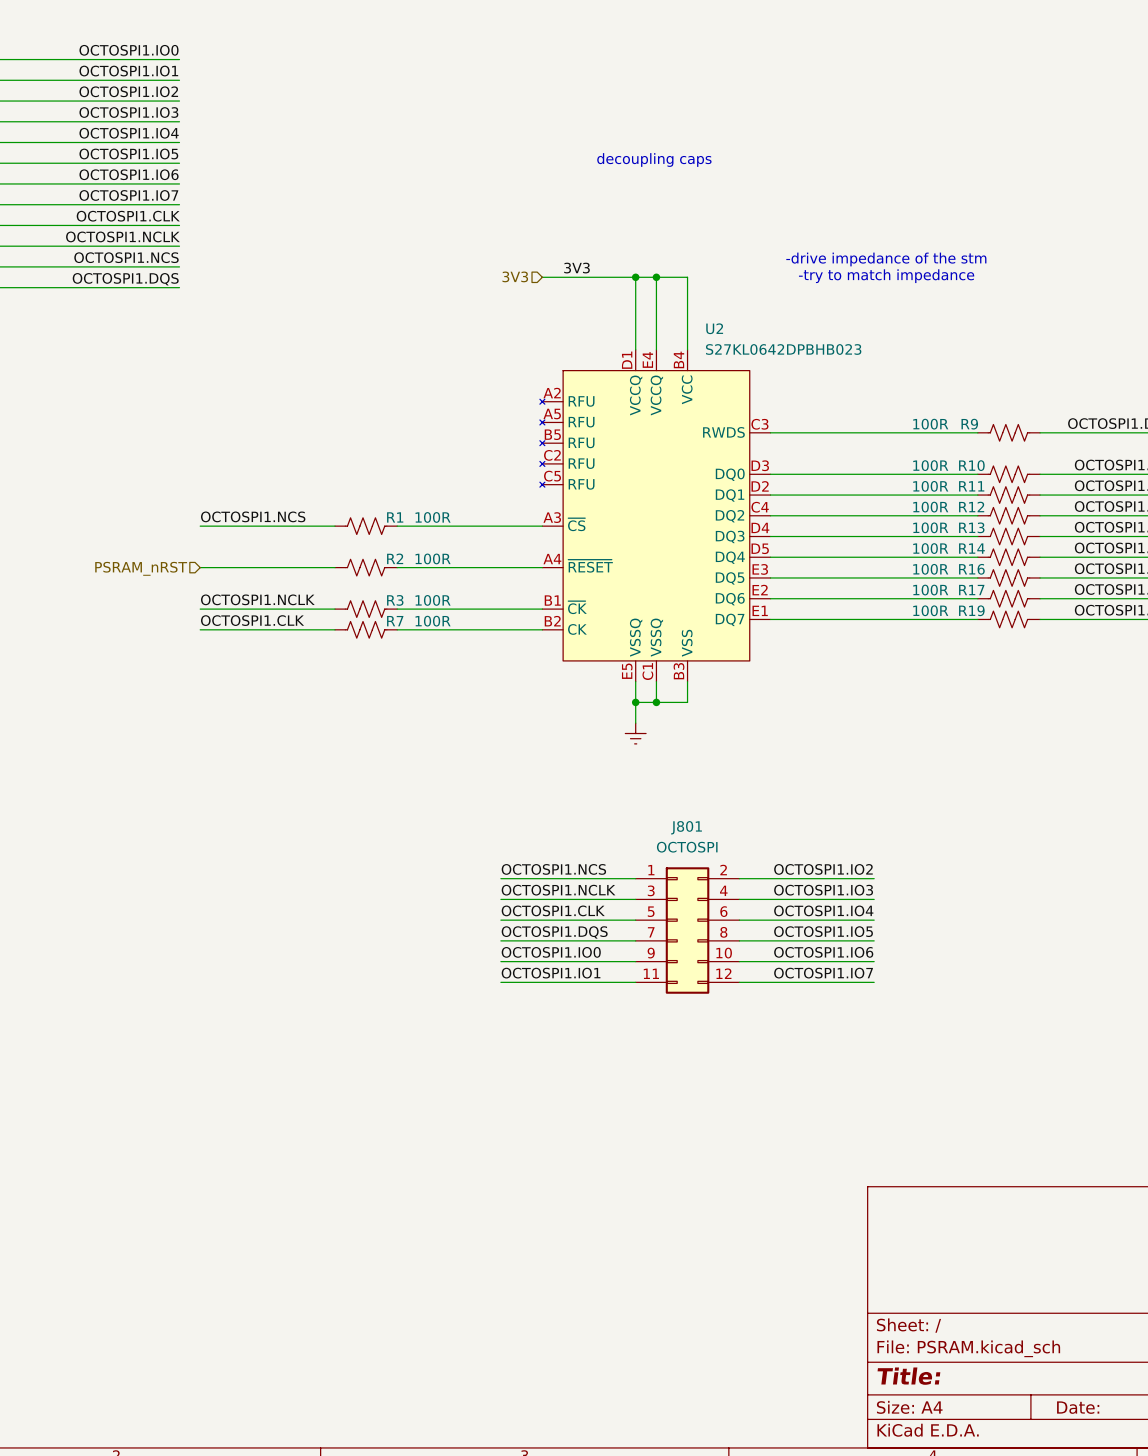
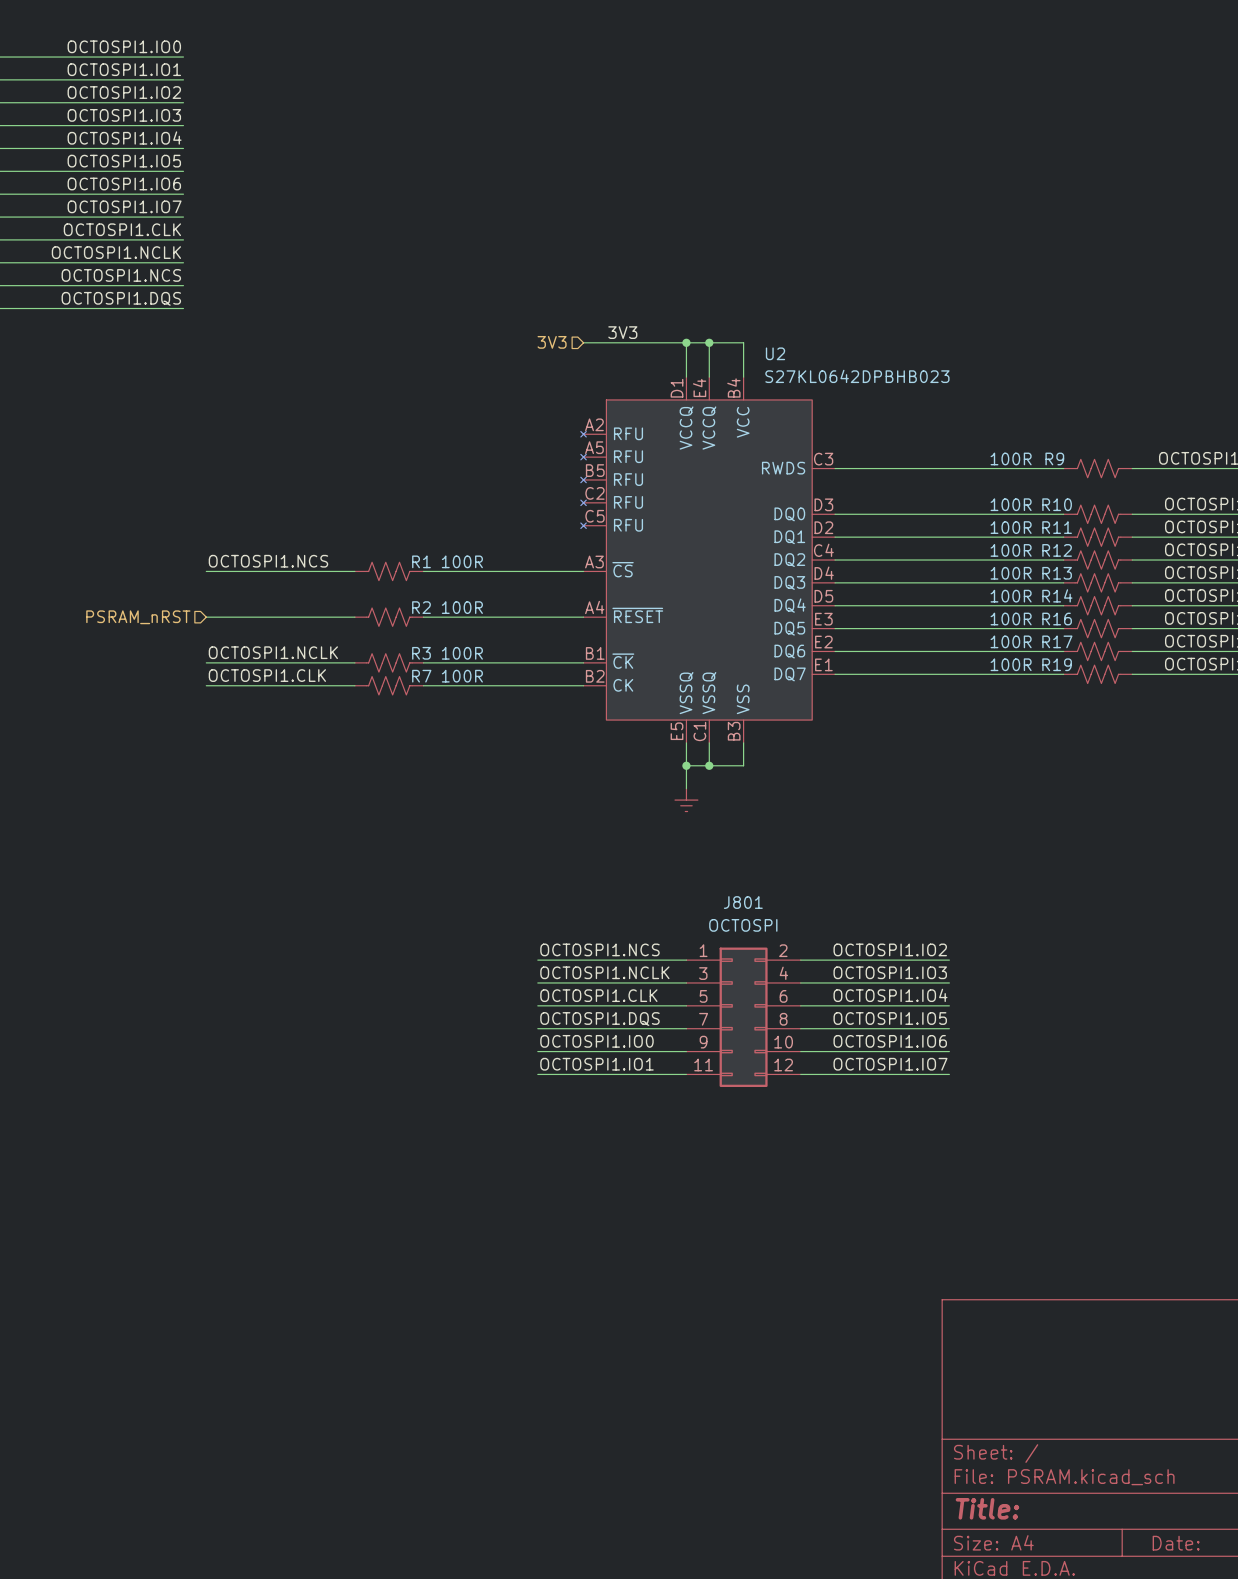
text: decoupling caps (654, 159) -> none
text: -drive impedance of the stm (886, 259) -> none
label position: 3V3 (577, 268) -> 3V3 (622, 332)
hierarchical label position: 3V3 (515, 276) -> 3V3 (552, 342)
text: -try to match impedance (886, 276) -> none
wire: (542, 277) (687, 277) (687, 318) -> (583, 342) (743, 342)
wire: (635, 277) (635, 318) -> none
junction: (635, 277) -> none
wire: (656, 277) (656, 318) -> none
junction: (656, 277) -> none
junction: none -> (686, 342)
junction: none -> (709, 342)

